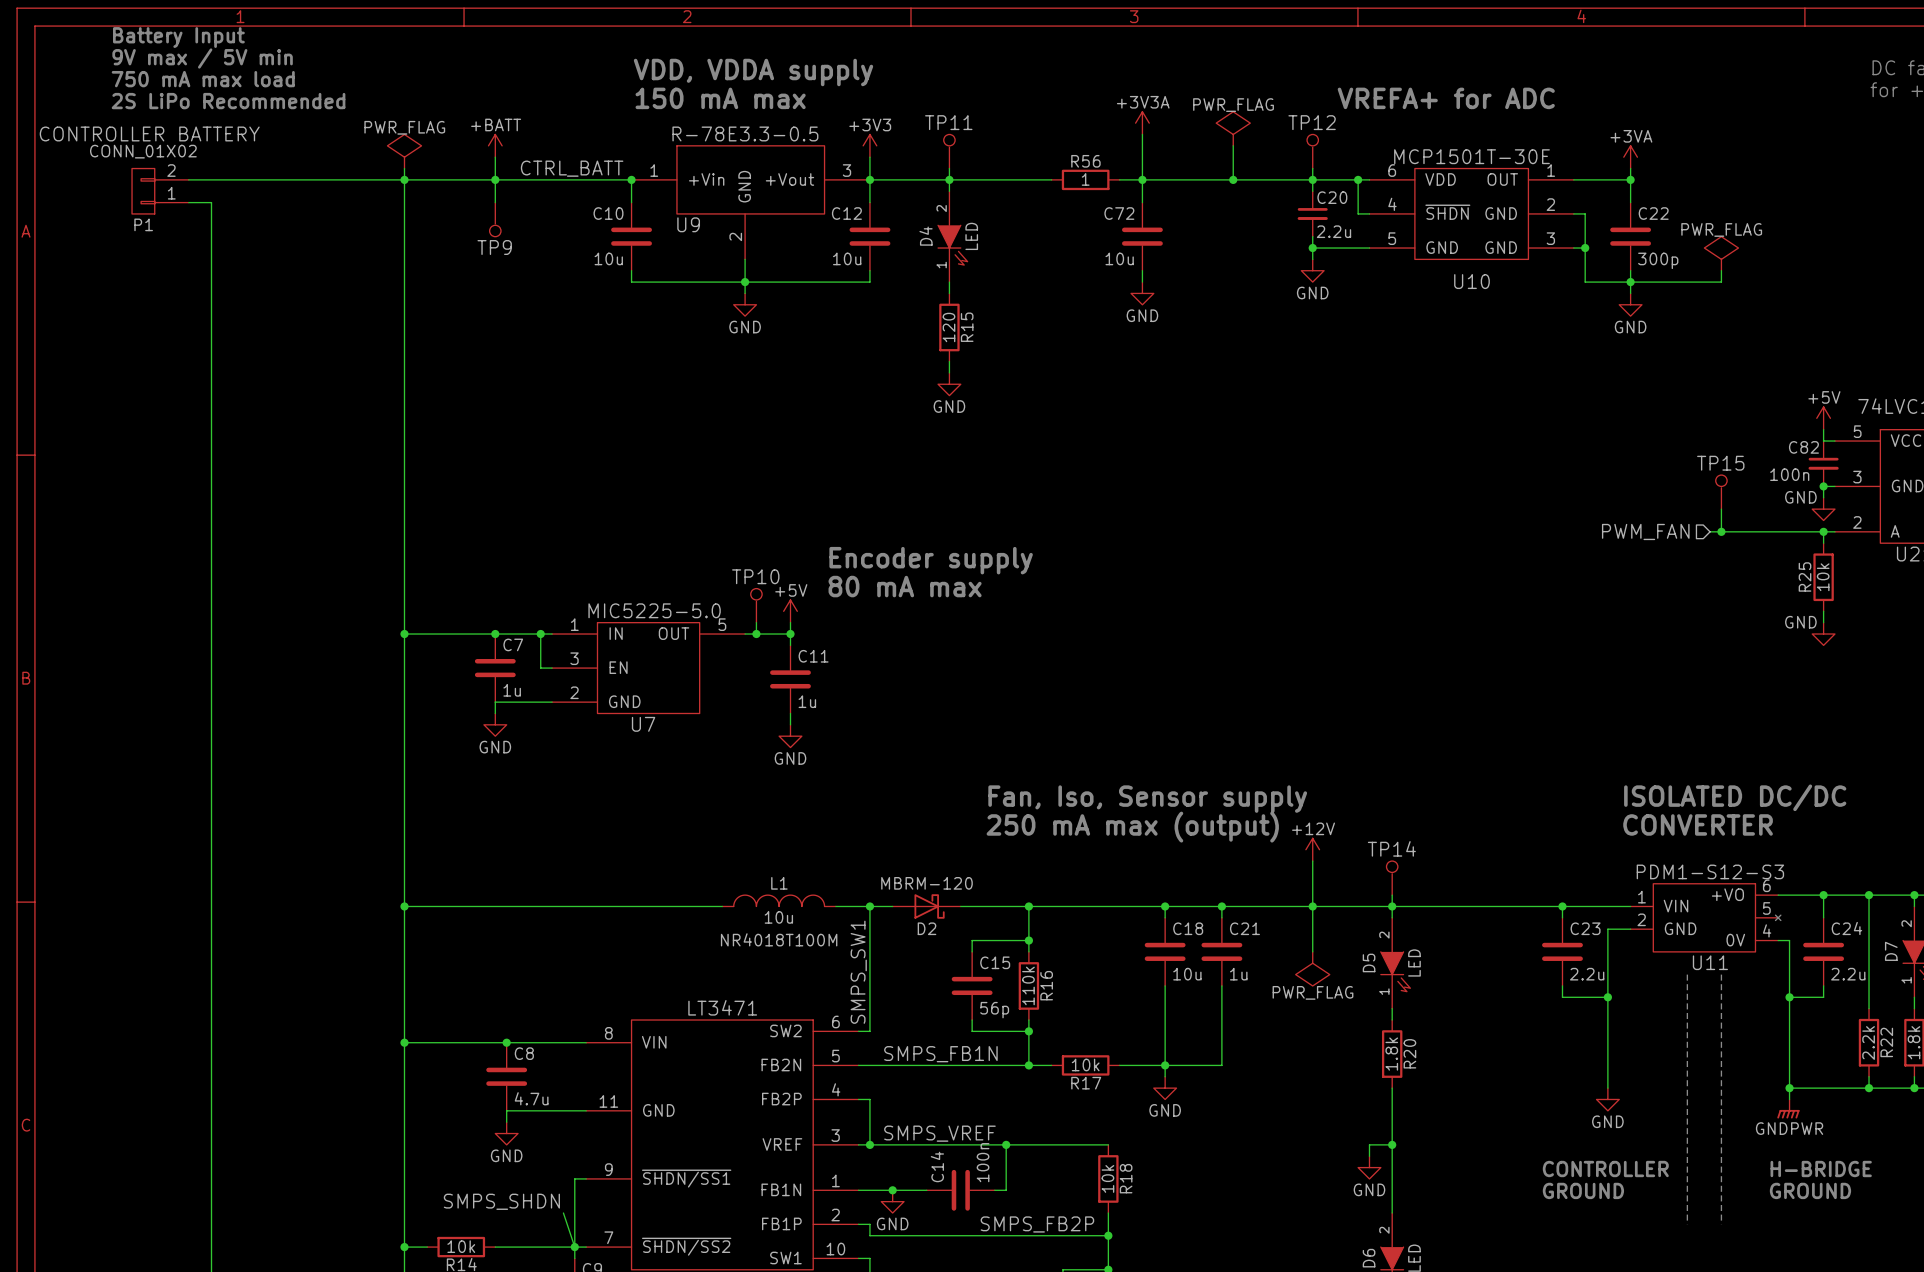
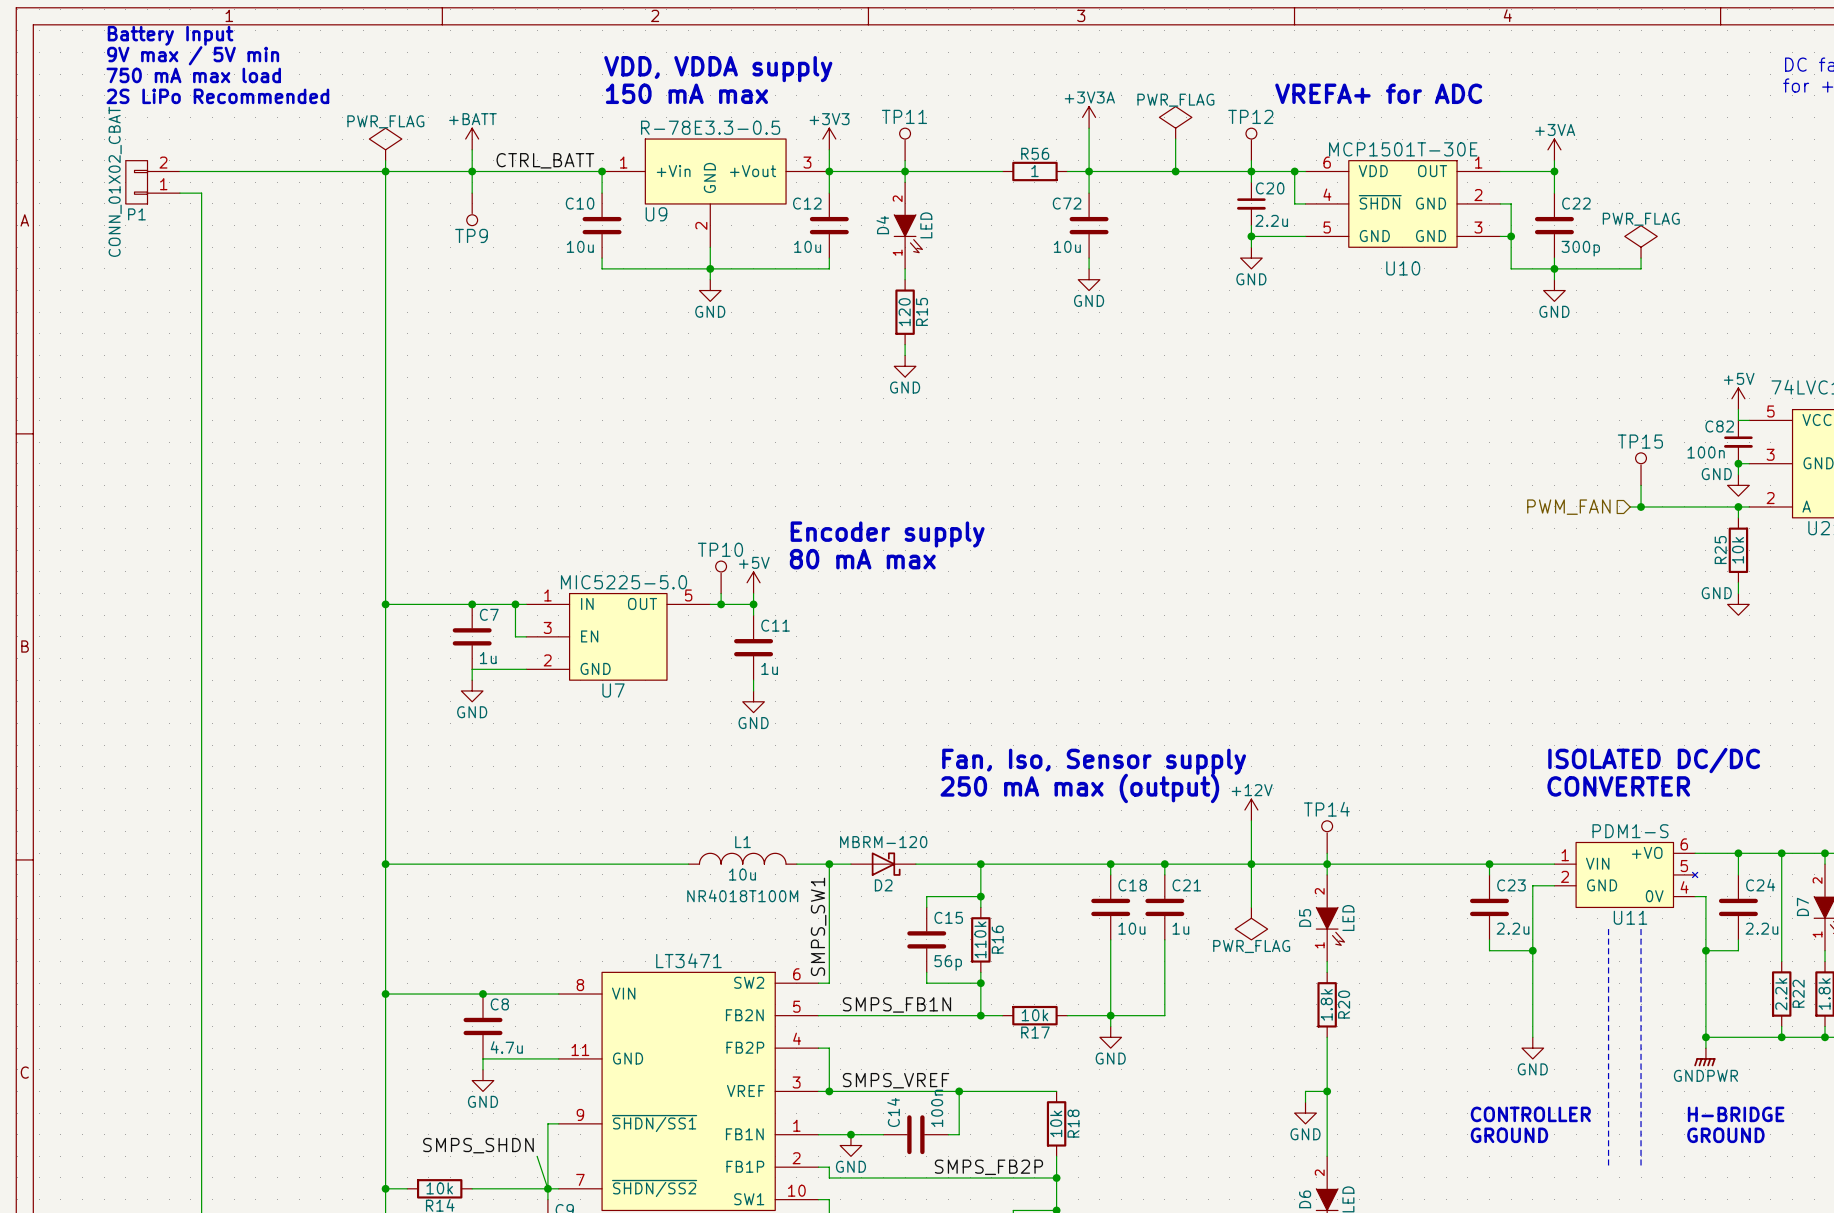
P1 text: CONTROLLER BATTERY (149, 133) -> none
P1 value: CONN_01X02 (143, 151) -> CONN_01X02_CBAT (115, 181)
U11 value: PDM1-S12-S3 (1710, 871) -> PDM1-S (1630, 831)

